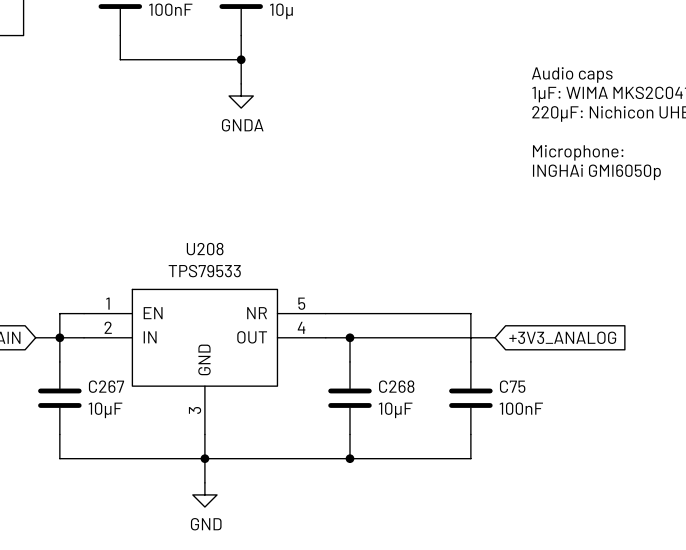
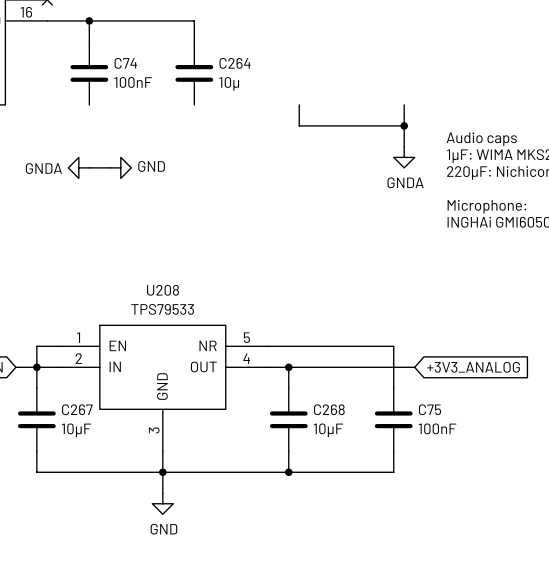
wire: (120, 35) (120, 59) (241, 59) -> none
wire: (241, 35) (241, 83) -> none
wire: none -> (299, 104) (299, 125) (404, 125)
wire: none -> (404, 104) (404, 146)
junction: (241, 59) -> none
junction: none -> (404, 125)
power symbol: GNDA (241, 96) -> none
power symbol: none -> GNDA (404, 157)
power symbol: none -> GNDA (78, 167)
wire: none -> (89, 167) (110, 167)
power symbol: none -> GND (120, 167)

